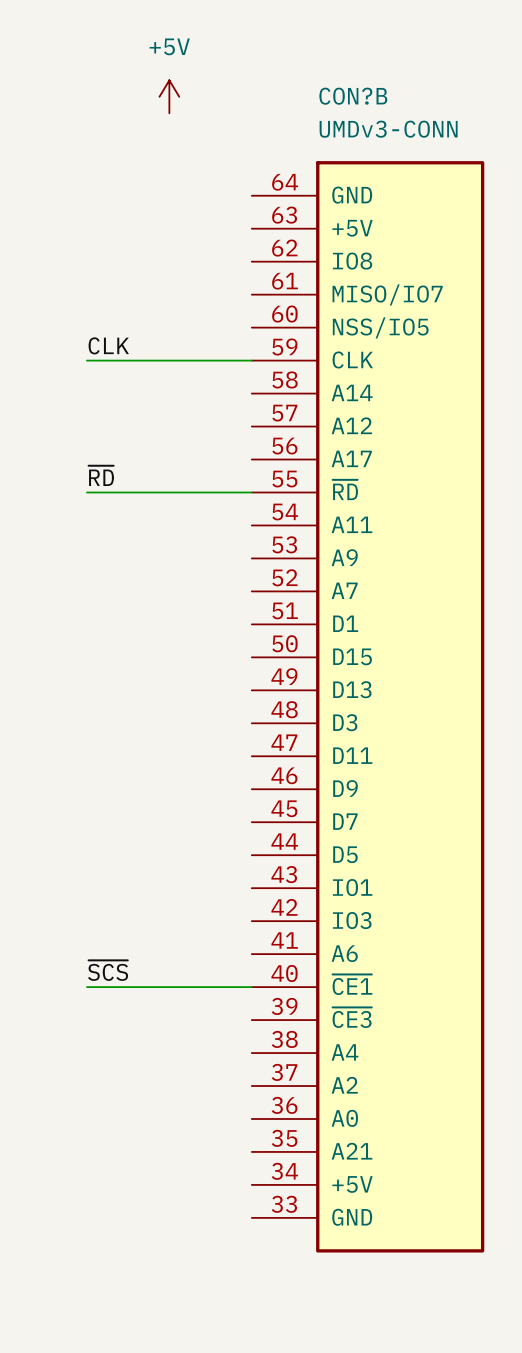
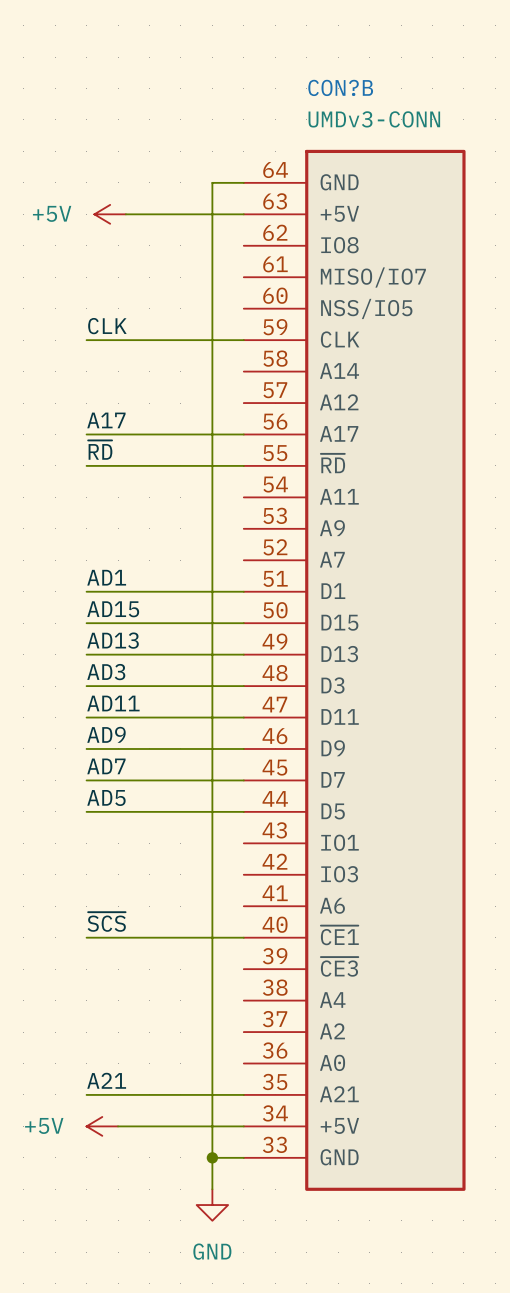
power symbol rotation: 0° (169, 96) -> 90° counterclockwise (110, 214)
power symbol position: +5V (169, 96) -> +5V (110, 214)
wire: none -> (243, 182) (212, 182) (212, 1189)
wire: none -> (125, 214) (243, 214)
label: none -> A17 (106, 420)
wire: none -> (86, 434) (243, 434)
label: none -> AD1 (106, 577)
wire: none -> (86, 591) (243, 591)
label: none -> AD15 (113, 609)
wire: none -> (86, 623) (243, 623)
label: none -> AD13 (113, 640)
wire: none -> (86, 654) (243, 654)
label: none -> AD3 (106, 672)
wire: none -> (86, 686) (243, 686)
label: none -> AD11 (113, 703)
wire: none -> (86, 717) (243, 717)
label: none -> AD9 (106, 734)
wire: none -> (86, 748) (243, 748)
label: none -> AD7 (106, 766)
wire: none -> (86, 780) (243, 780)
label: none -> AD5 (106, 798)
wire: none -> (86, 811) (243, 811)
label: none -> A21 (106, 1080)
wire: none -> (86, 1094) (243, 1094)
power symbol: none -> +5V (102, 1126)
wire: none -> (118, 1126) (243, 1126)
wire: none -> (212, 1157) (243, 1157)
junction: none -> (212, 1157)
power symbol: none -> GND (212, 1205)

